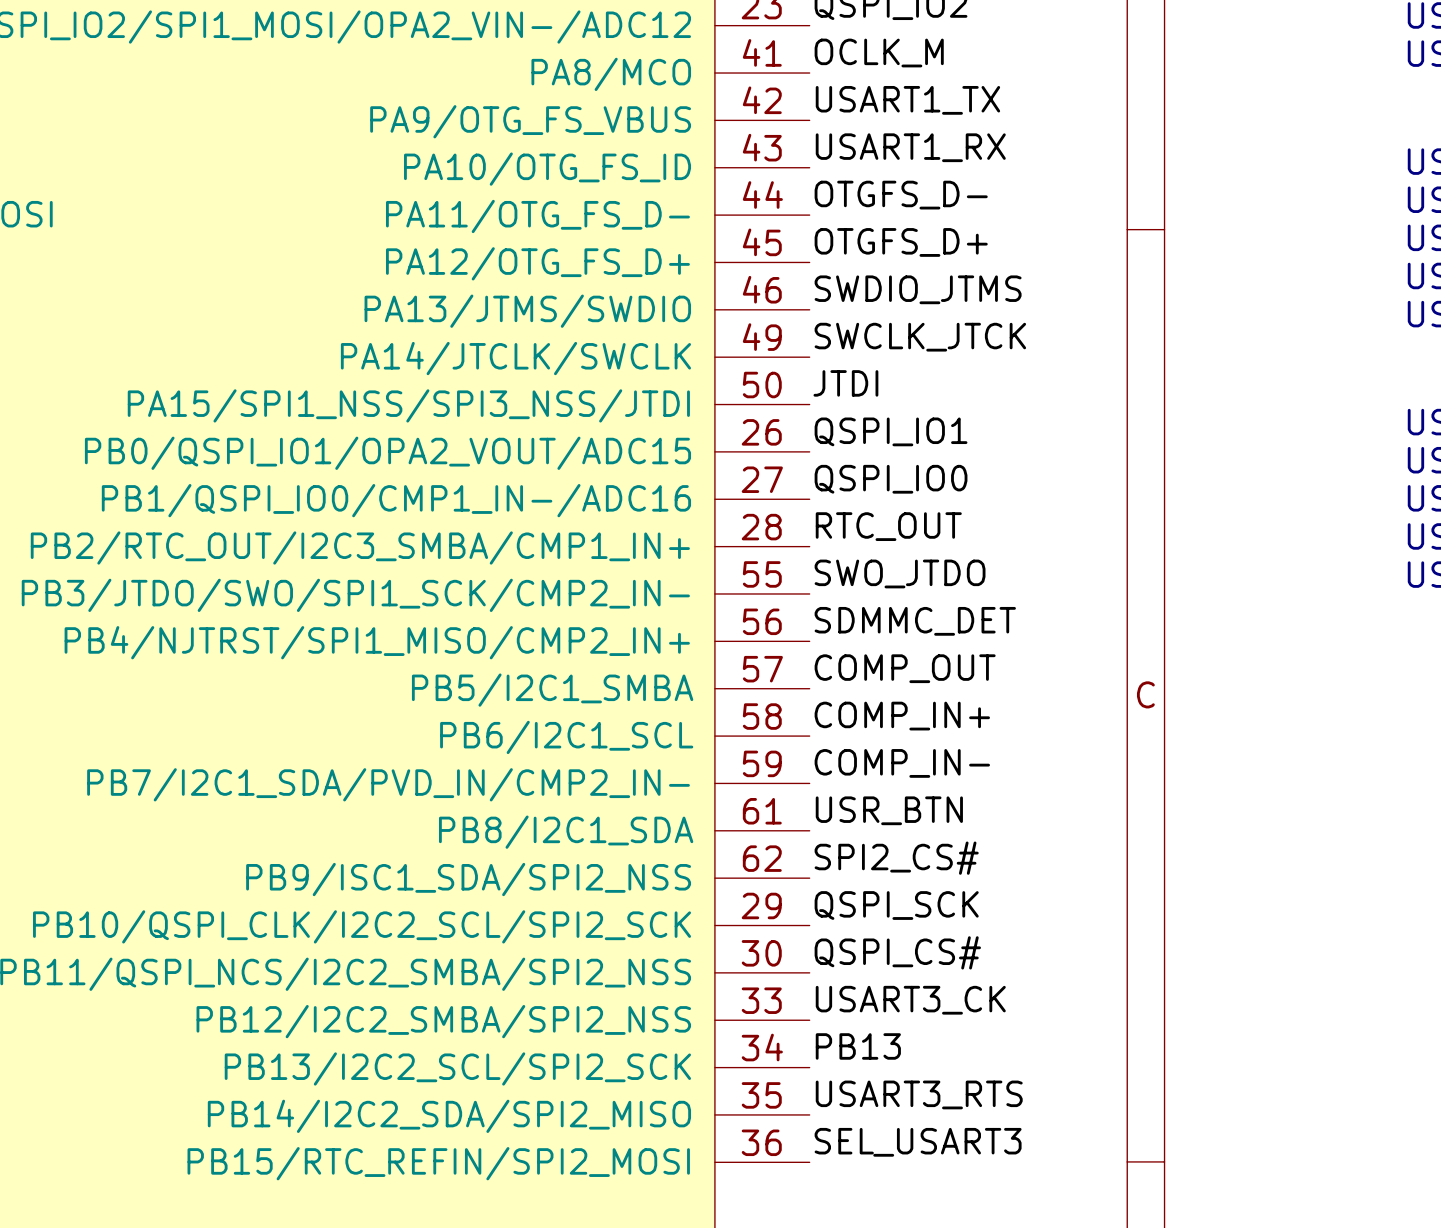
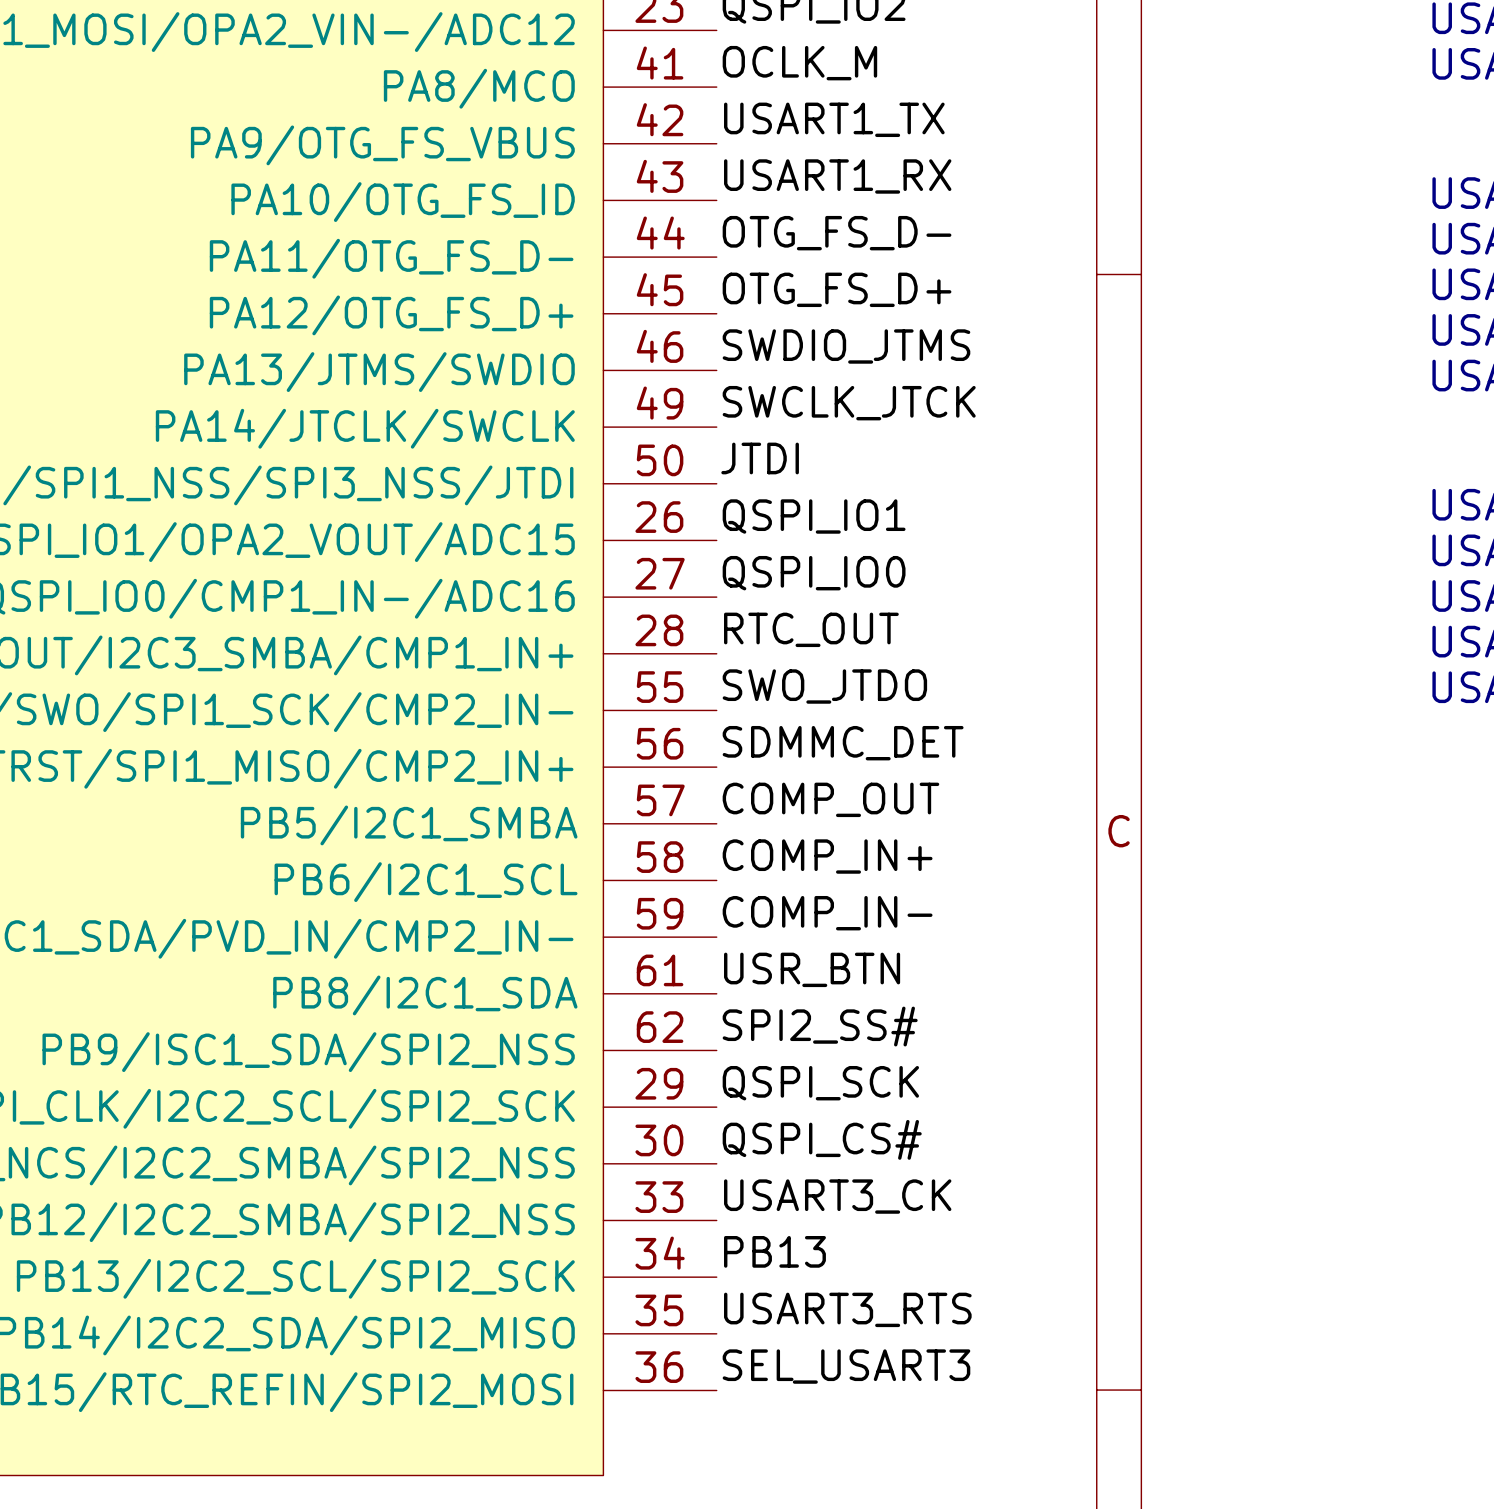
label: OTGFS_D- (901, 195) -> OTG_FS_D- (837, 233)
label: OTGFS_D+ (901, 242) -> OTG_FS_D+ (837, 289)
label: SPI2_CS# (896, 858) -> SPI2_SS# (820, 1026)

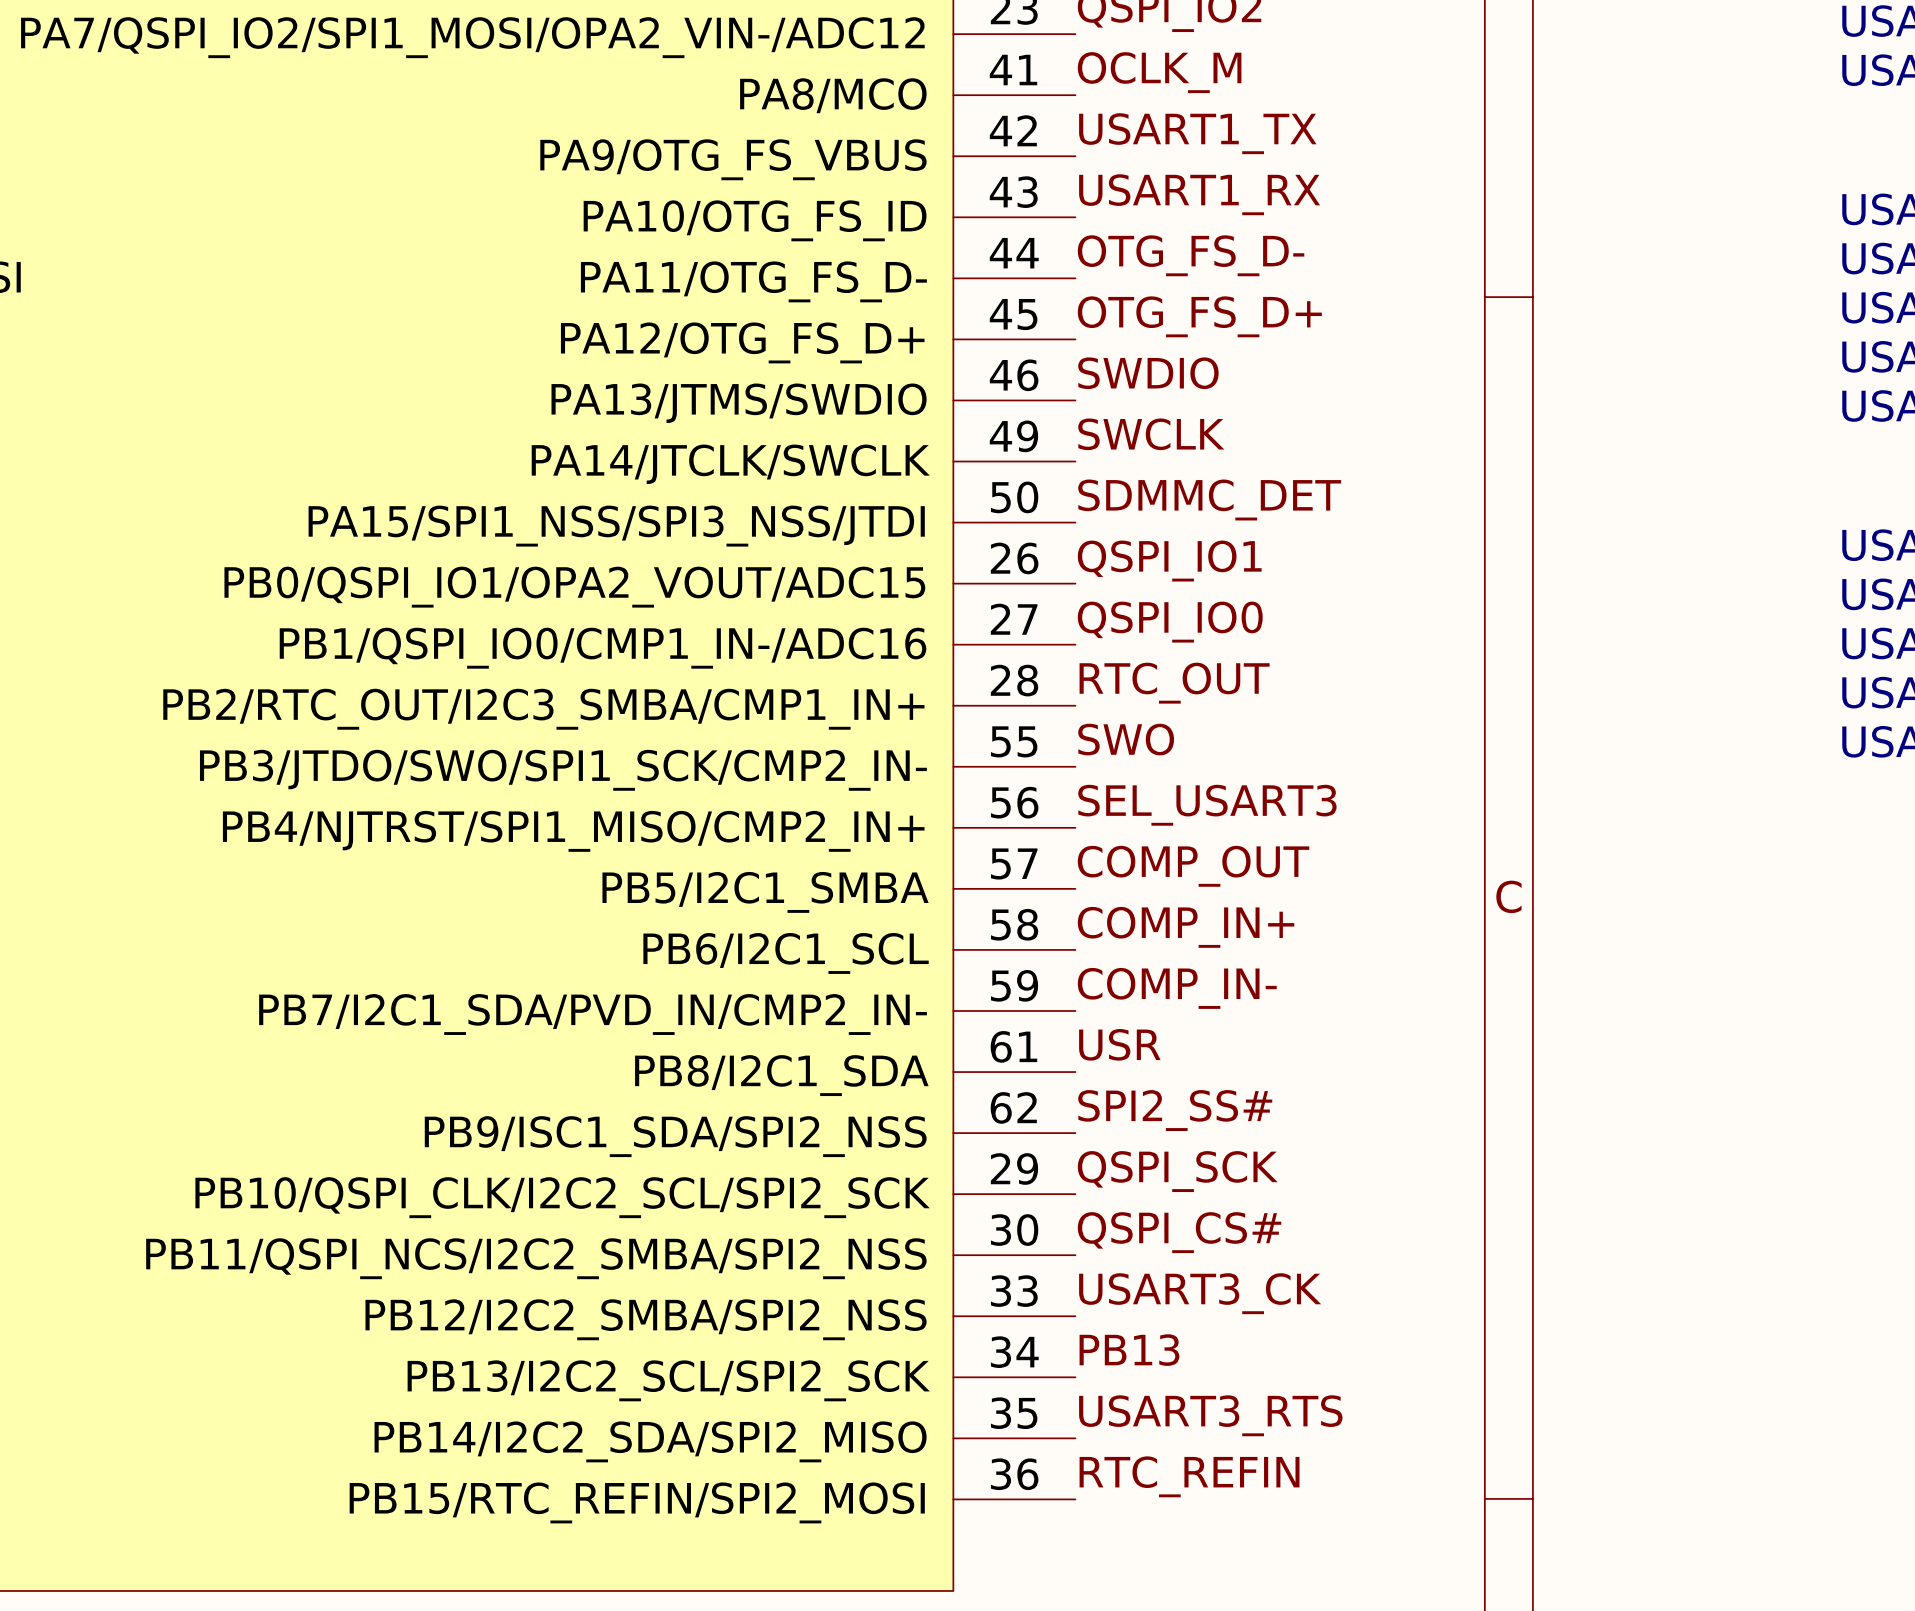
label: SWDIO_JTMS (846, 346) -> SWDIO (1148, 373)
label: SWCLK_JTCK (849, 403) -> SWCLK (1151, 434)
label: JTDI (760, 458) -> SDMMC_DET (1209, 499)
label: SWO_JTDO (824, 686) -> SWO (1126, 739)
label: SDMMC_DET (843, 743) -> SEL_USART3 (1207, 805)
label: USR_BTN (812, 969) -> USR (1119, 1044)
label: SEL_USART3 (846, 1366) -> RTC_REFIN (1189, 1476)

